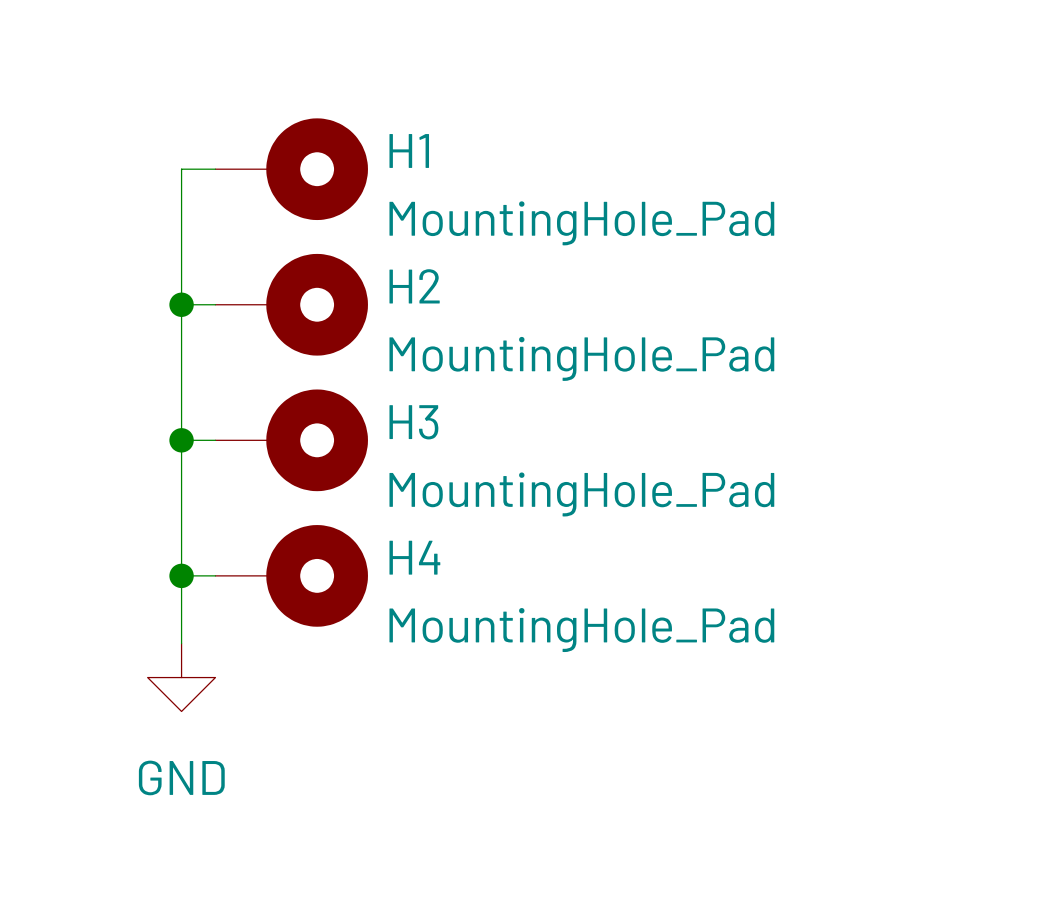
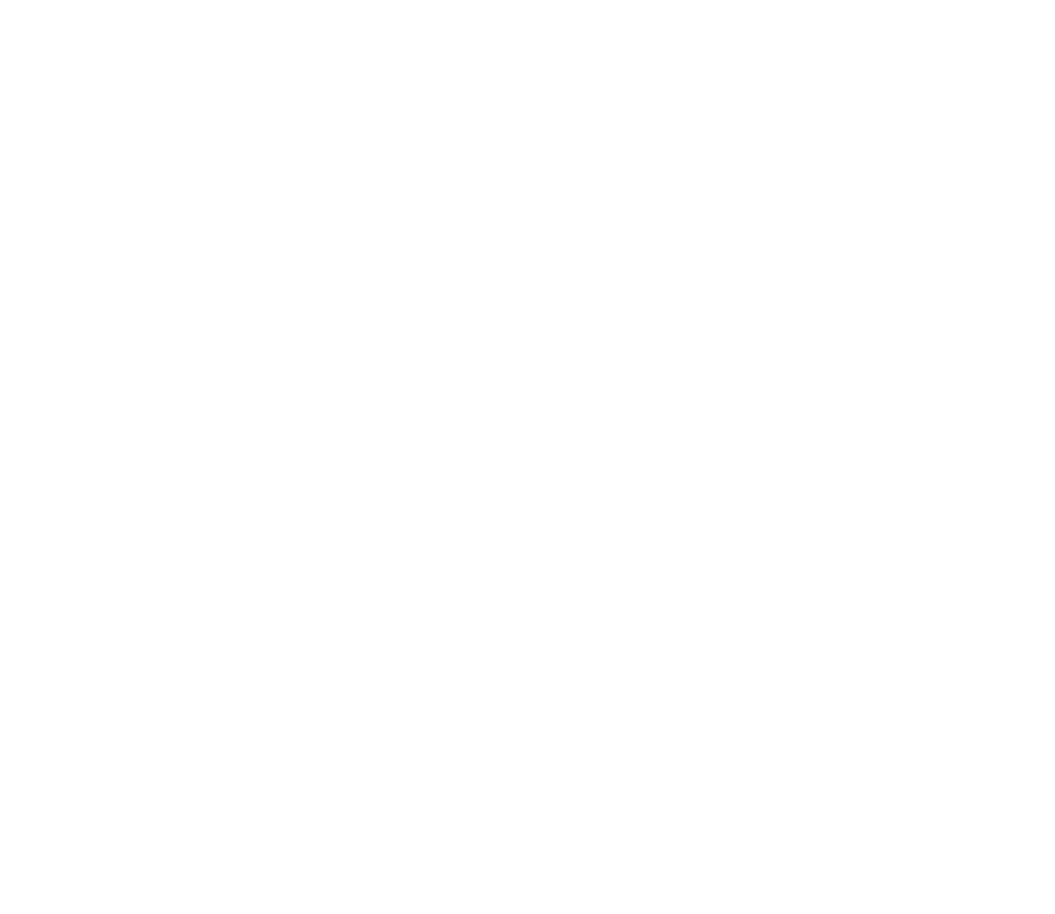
wire: (215, 169) (181, 169) (181, 643) -> none
H1: MountingHole_Pad (291, 169) -> none
wire: (181, 304) (215, 304) -> none
junction: (181, 304) -> none
H2: MountingHole_Pad (291, 304) -> none
wire: (181, 440) (215, 440) -> none
junction: (181, 440) -> none
H3: MountingHole_Pad (291, 440) -> none
wire: (181, 575) (215, 575) -> none
junction: (181, 575) -> none
H4: MountingHole_Pad (291, 575) -> none
power symbol: GND (181, 677) -> none

